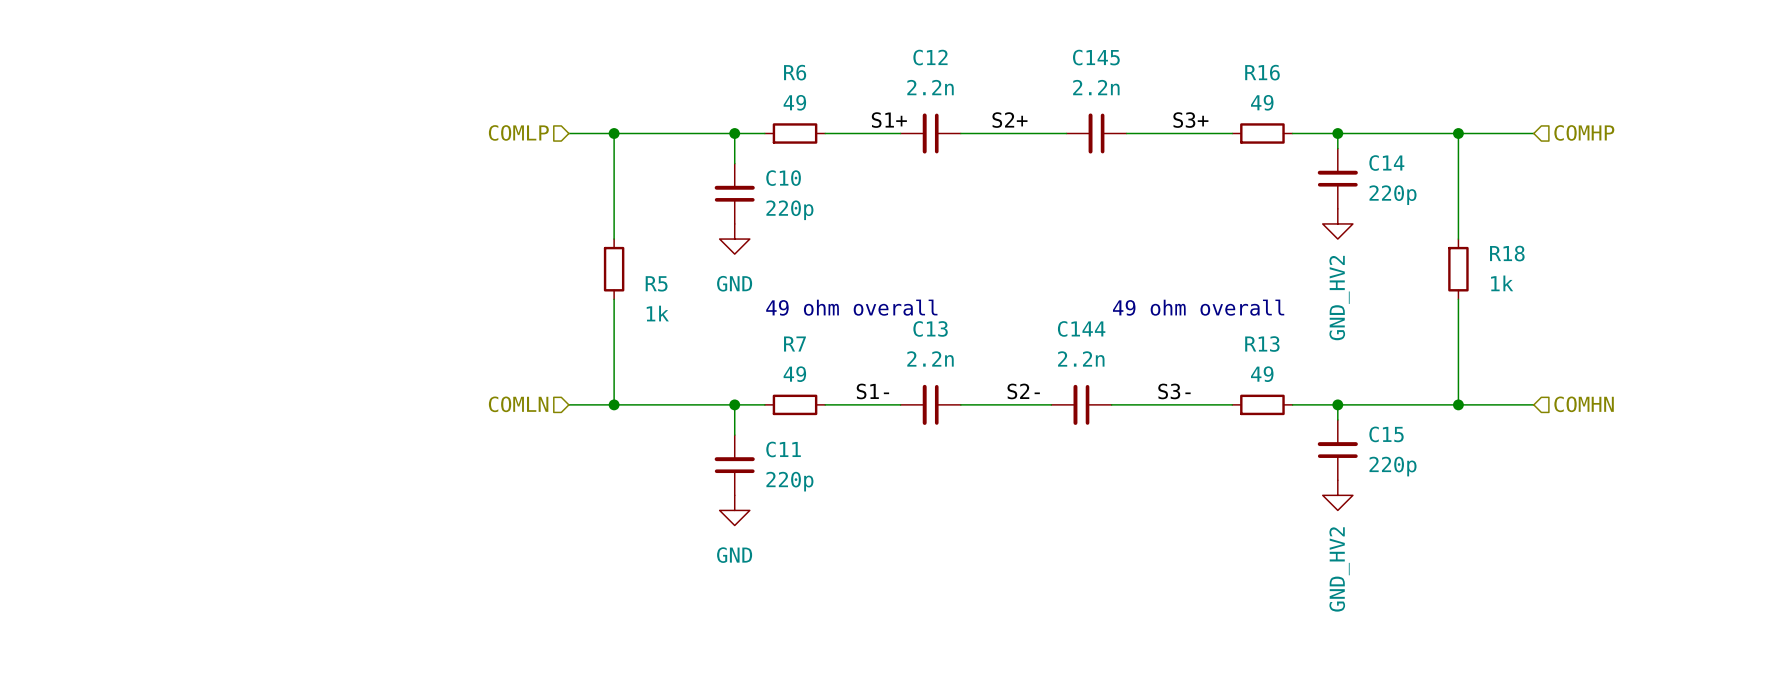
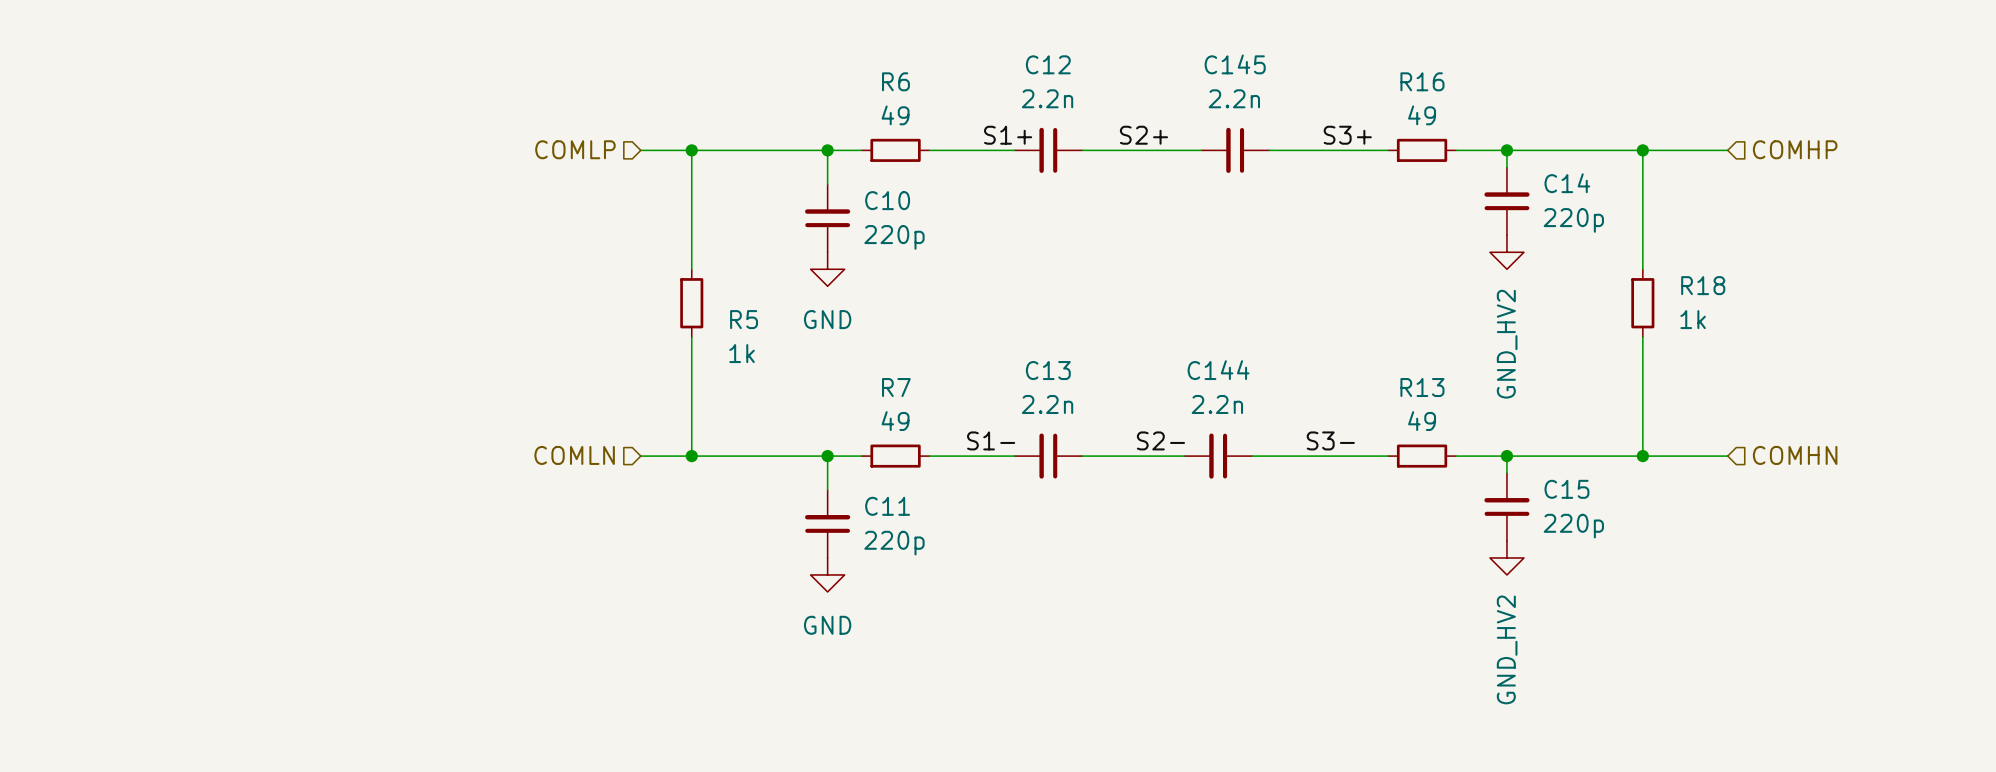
text: 49 ohm overall (851, 307) -> none
text: 49 ohm overall (1198, 307) -> none

